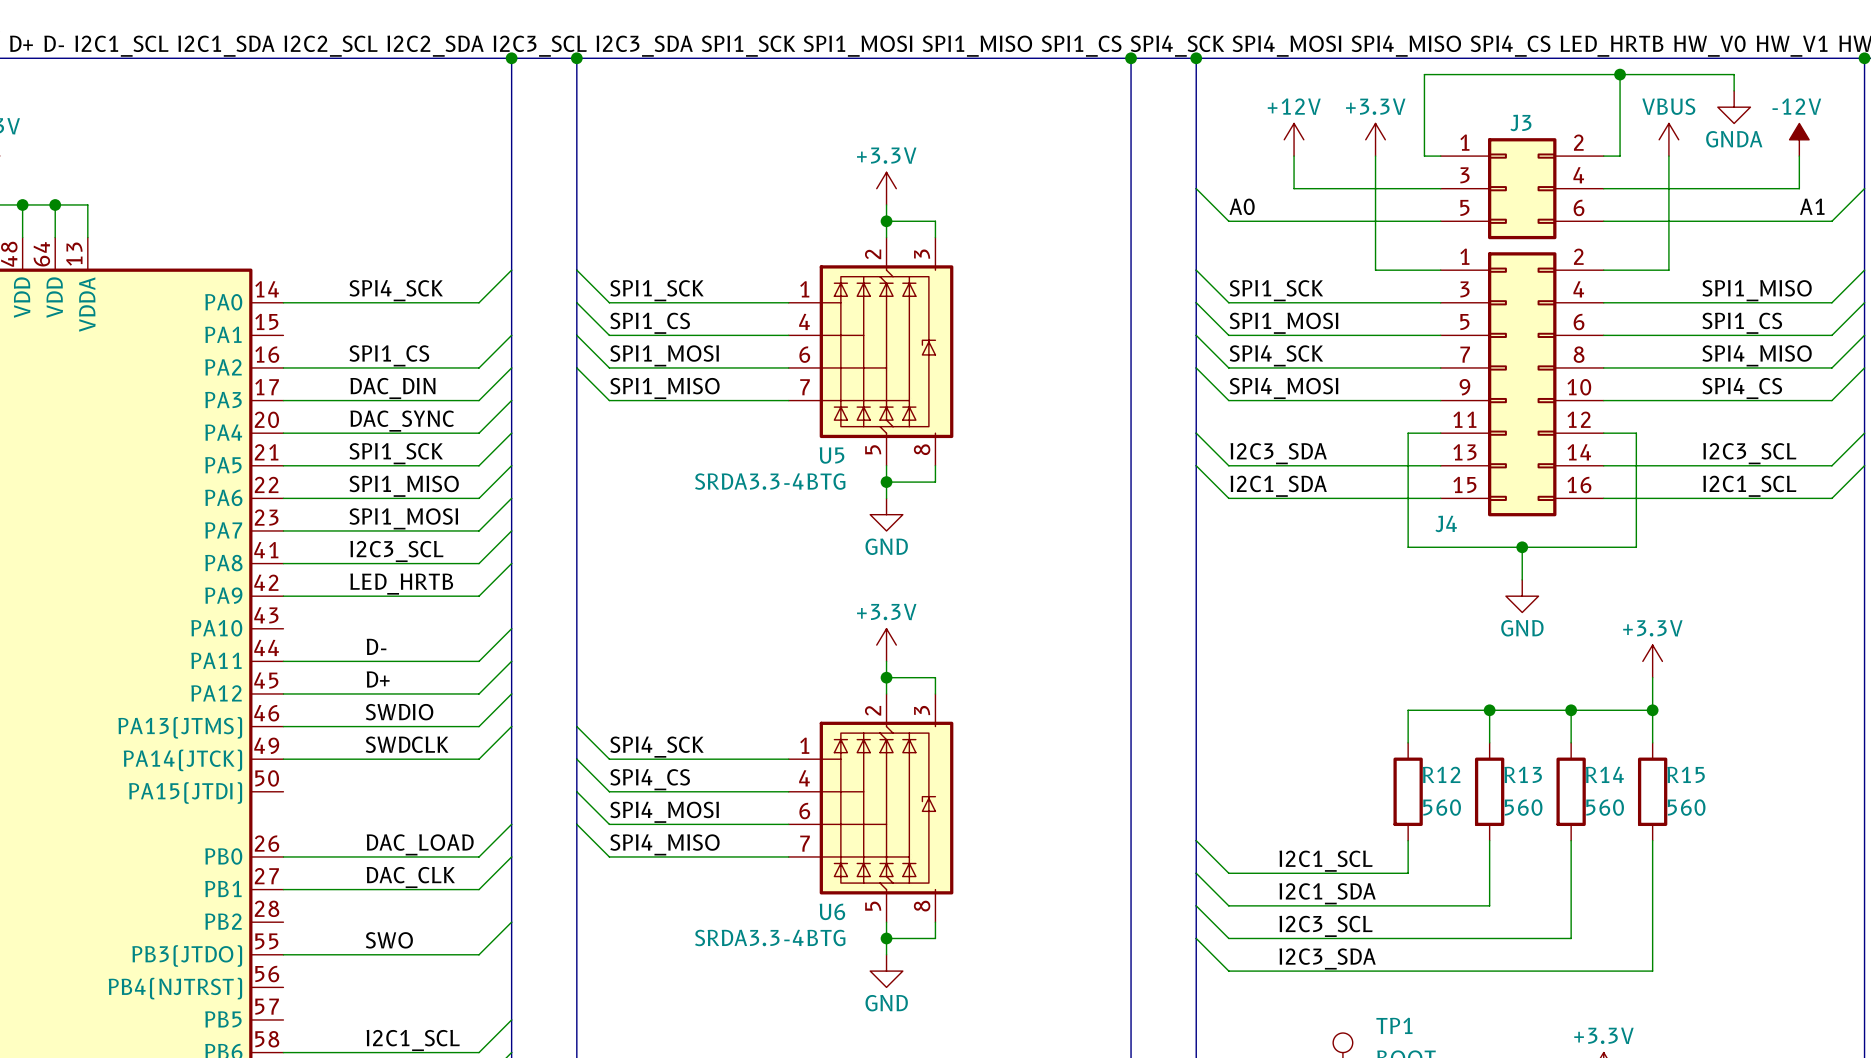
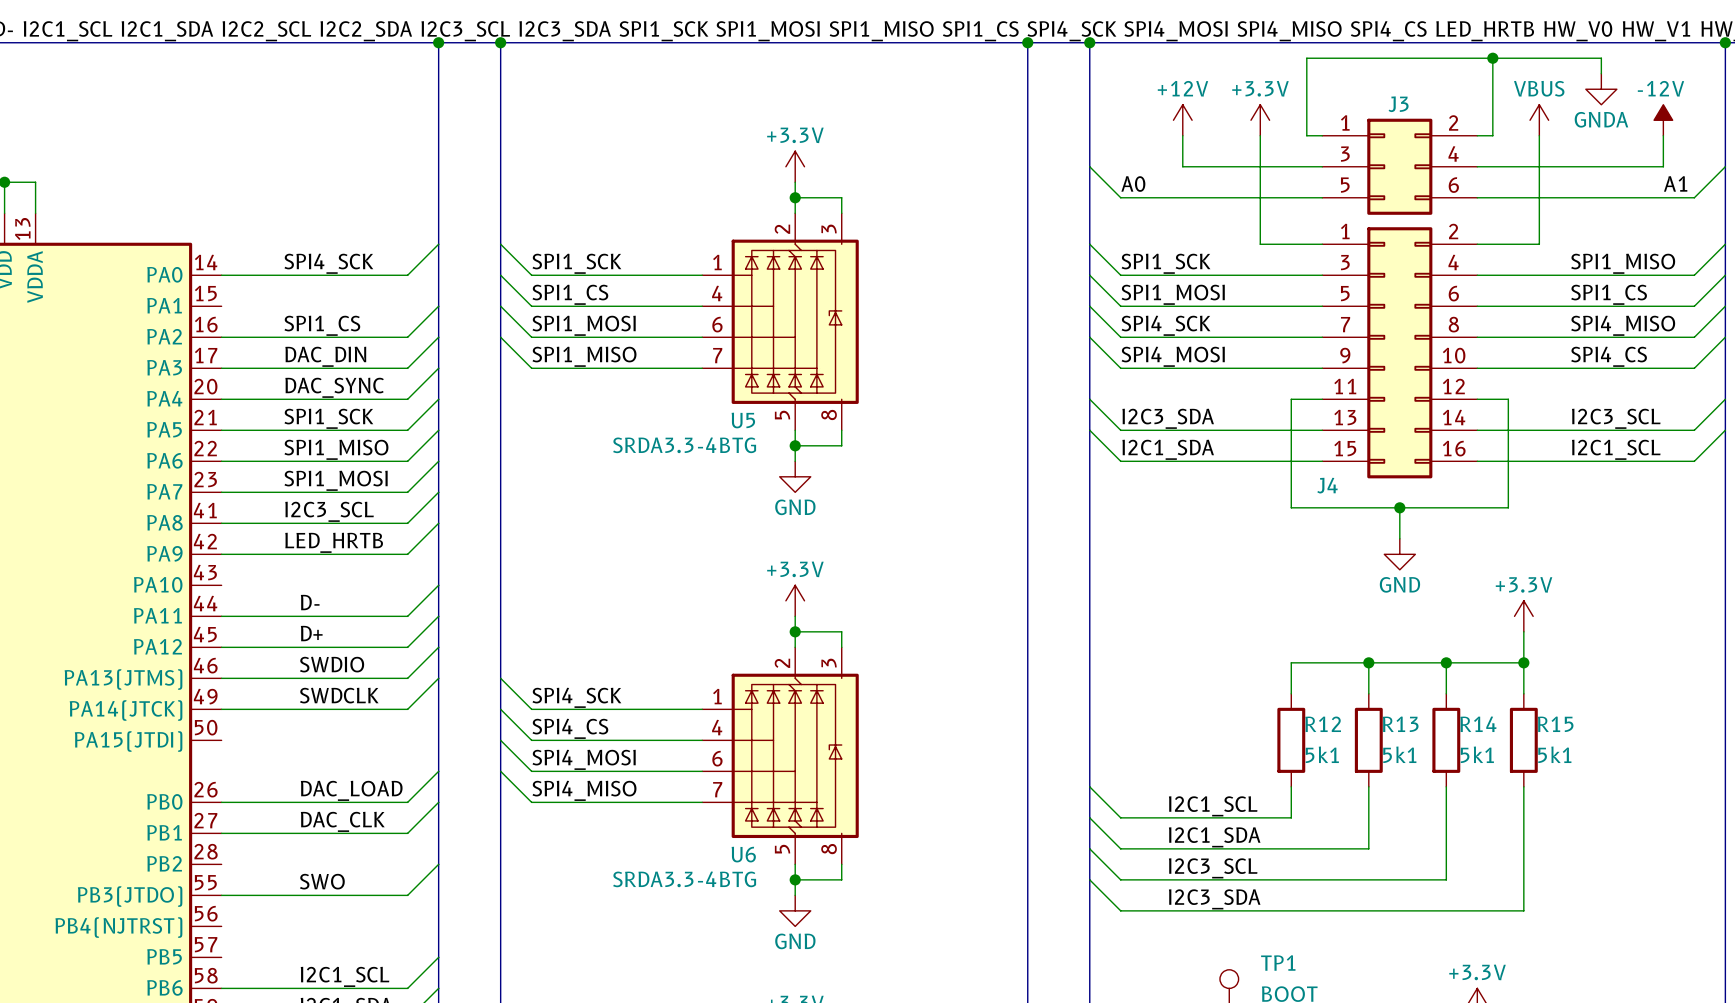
R12 value: 560 (1442, 807) -> 5k1 (1322, 754)
R13 value: 560 (1523, 807) -> 5k1 (1399, 754)
R14 value: 560 (1605, 807) -> 5k1 (1477, 754)
R15 value: 560 (1686, 807) -> 5k1 (1554, 754)

